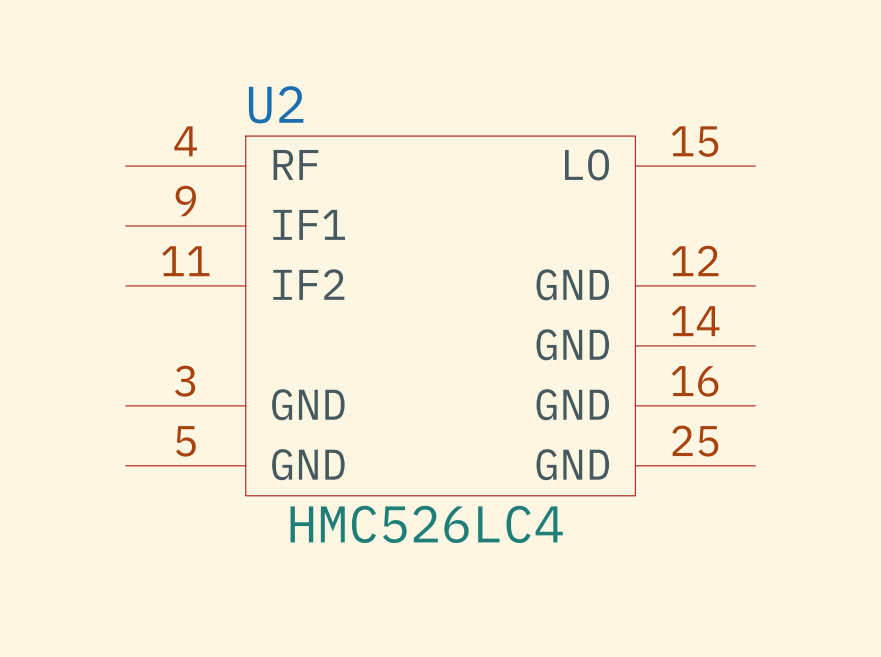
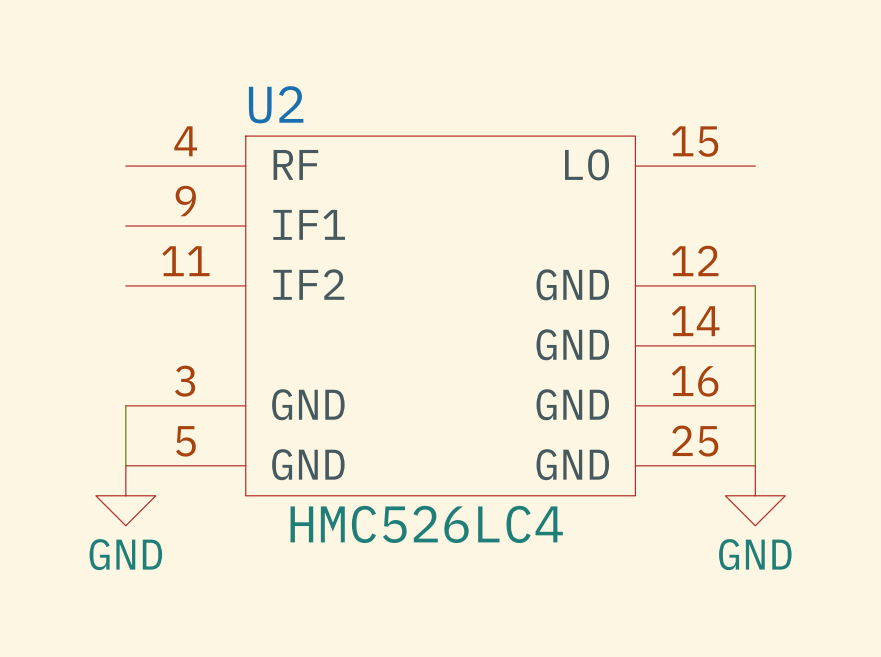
wire: none -> (755, 285) (755, 465)
wire: none -> (125, 405) (125, 465)
power symbol: none -> GND (125, 495)
power symbol: none -> GND (755, 495)

